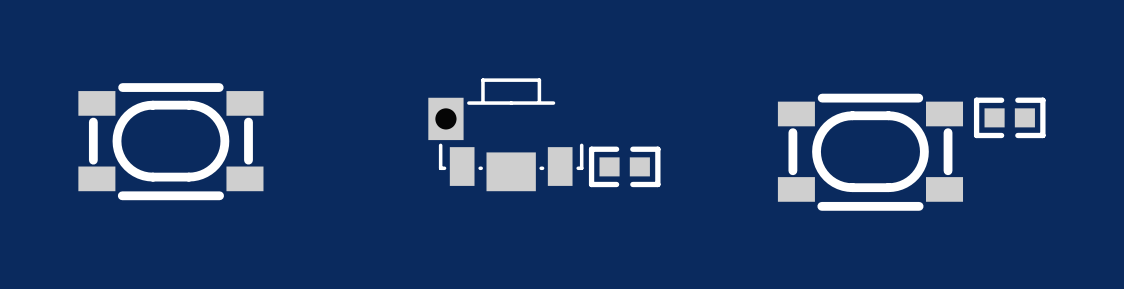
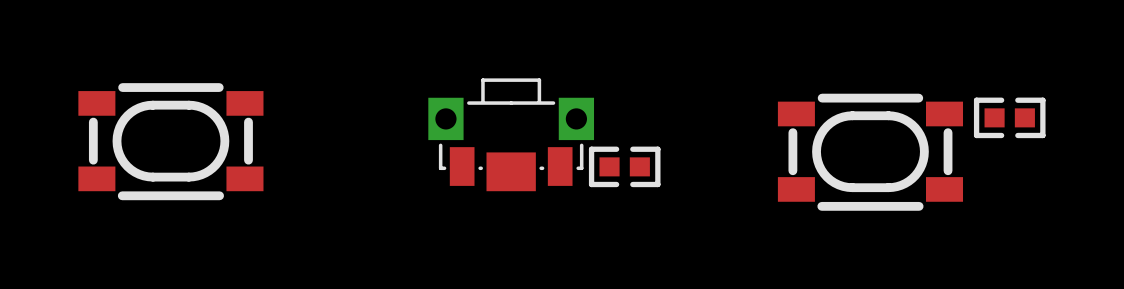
part footprint: [428, 78, 584, 192] -> [428, 78, 595, 192]

